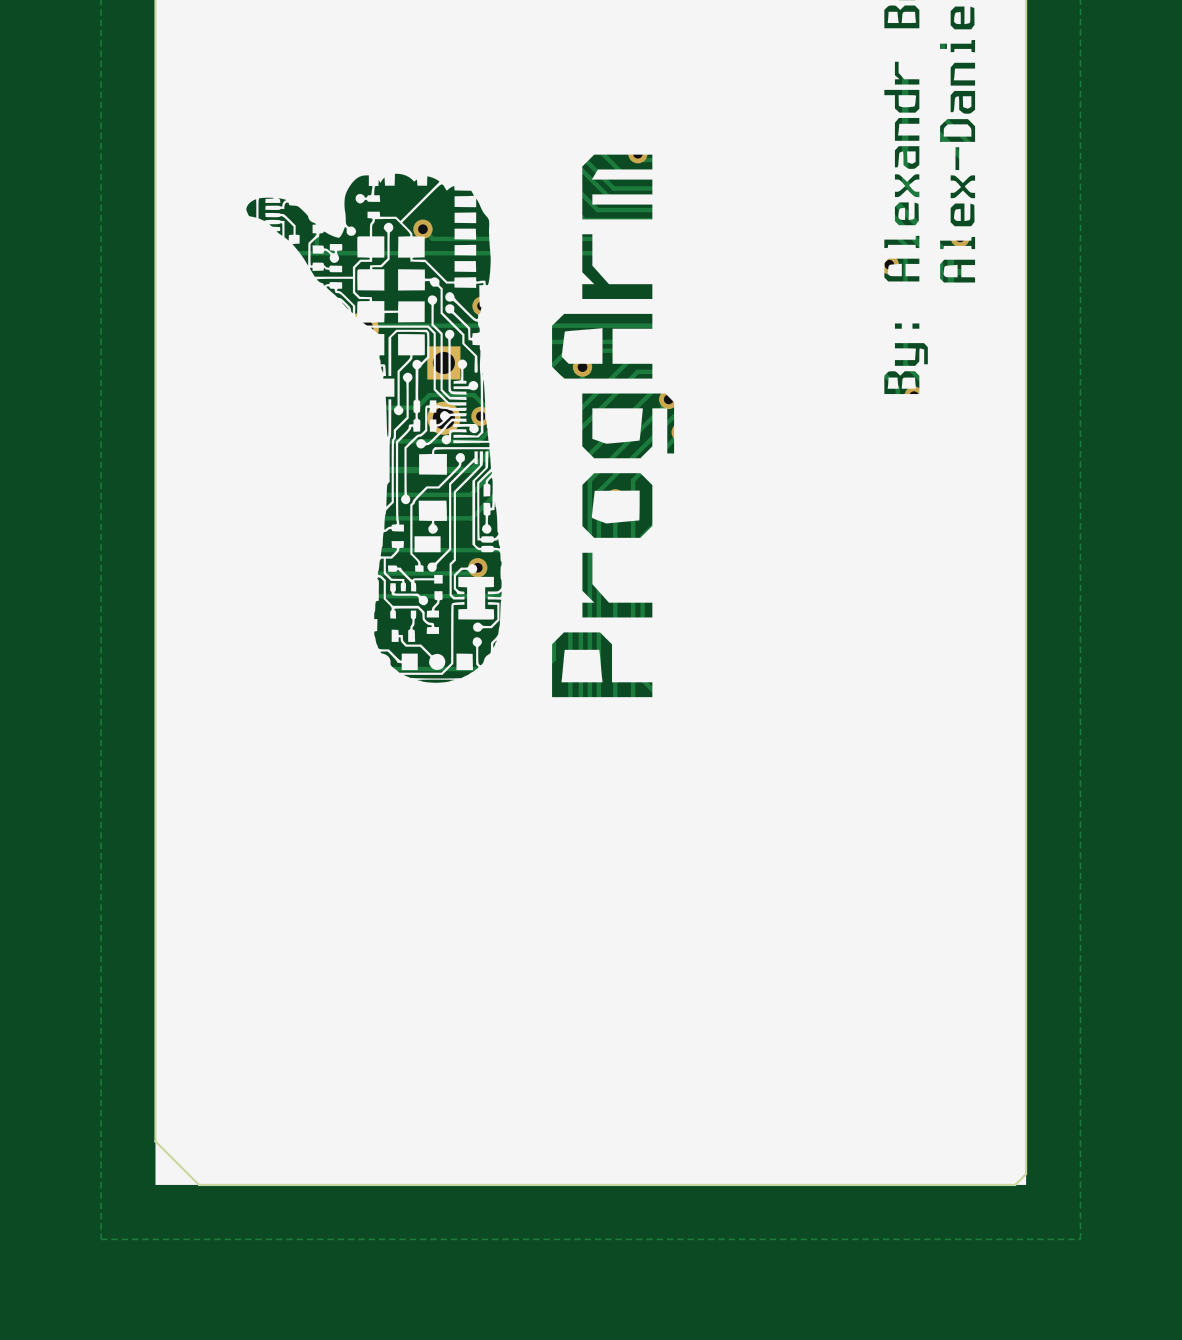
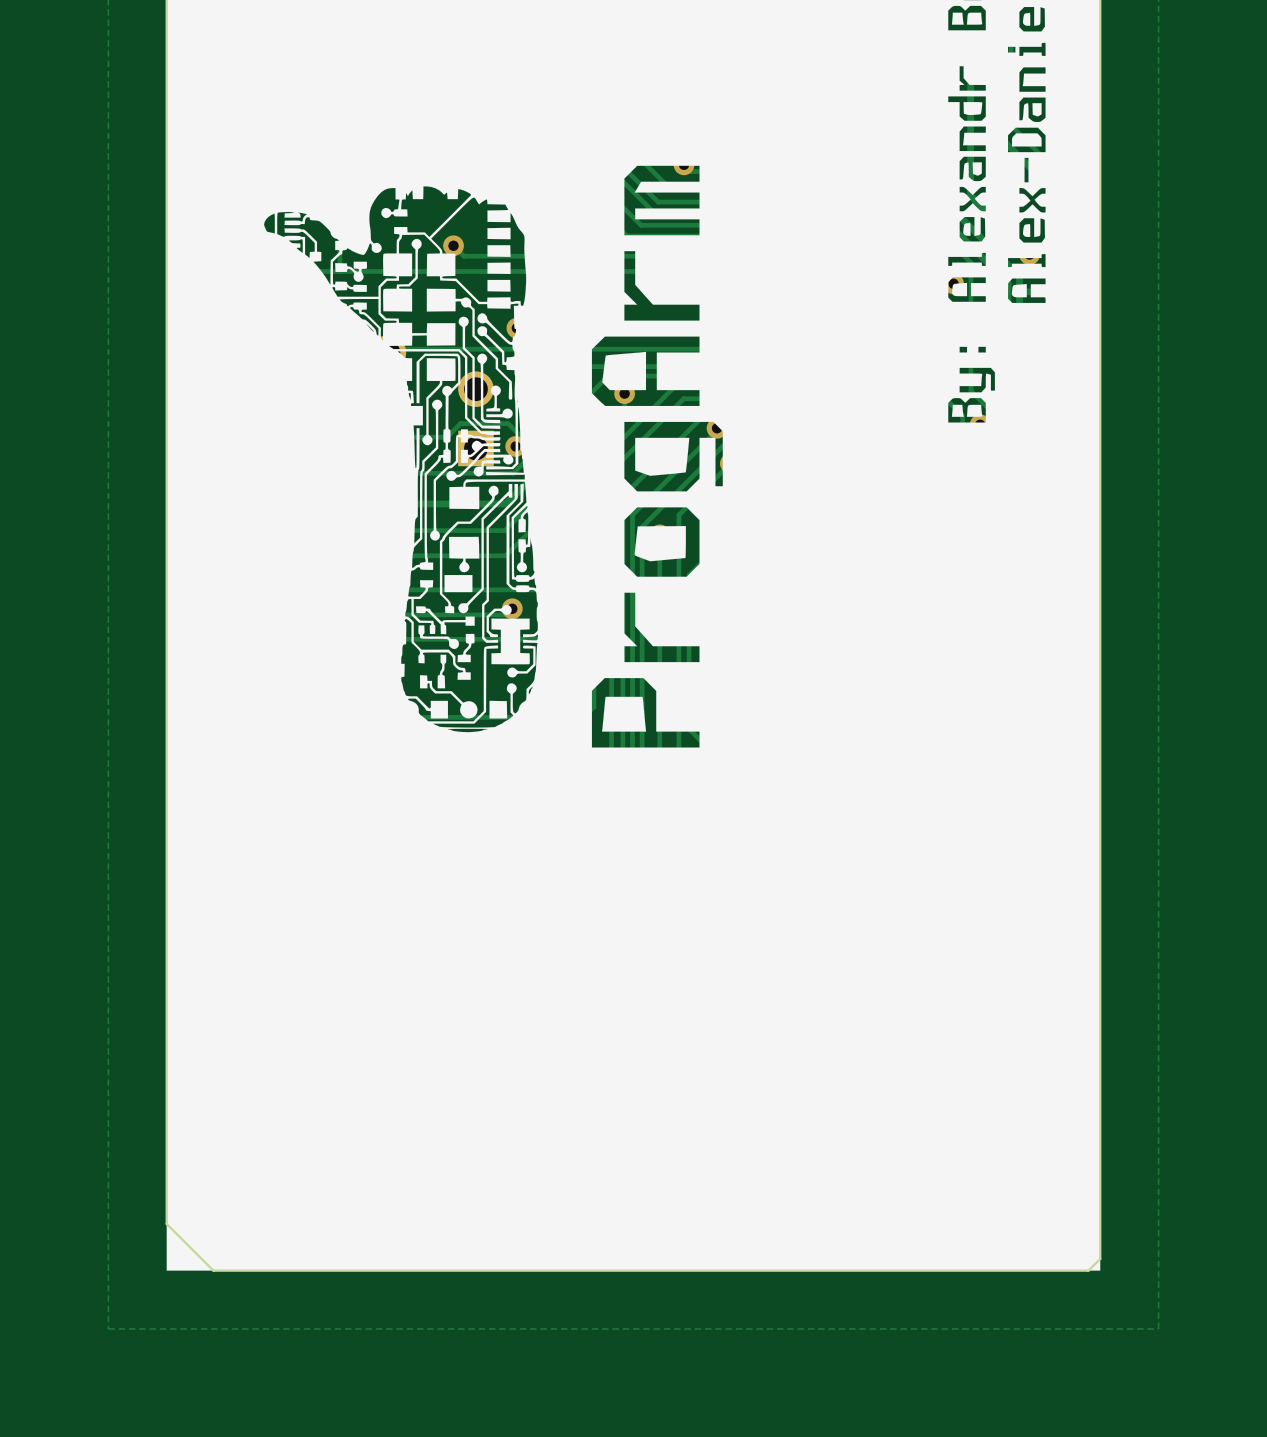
part rotation: 0° (443, 390) -> 180° (475, 418)

